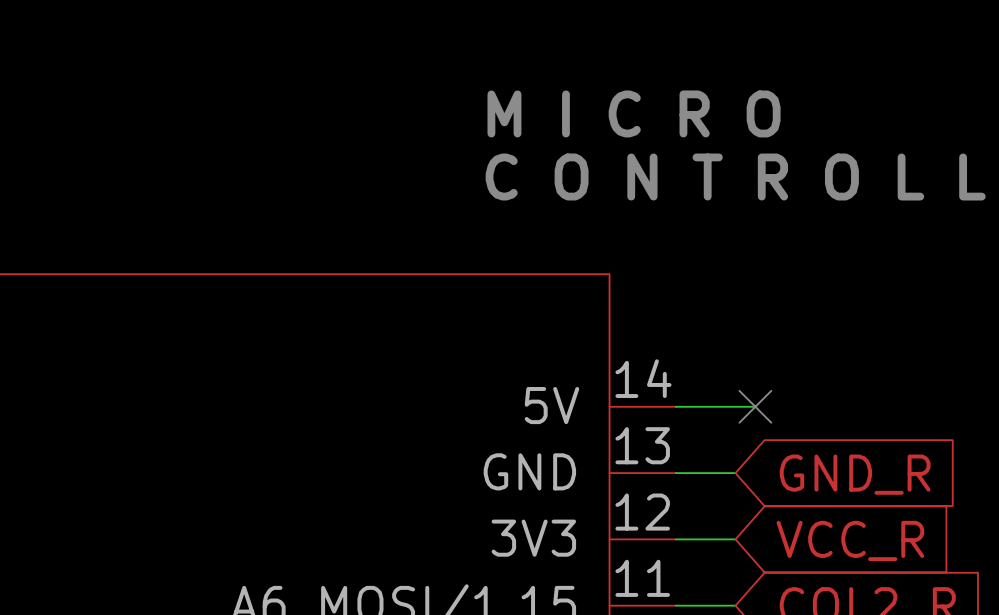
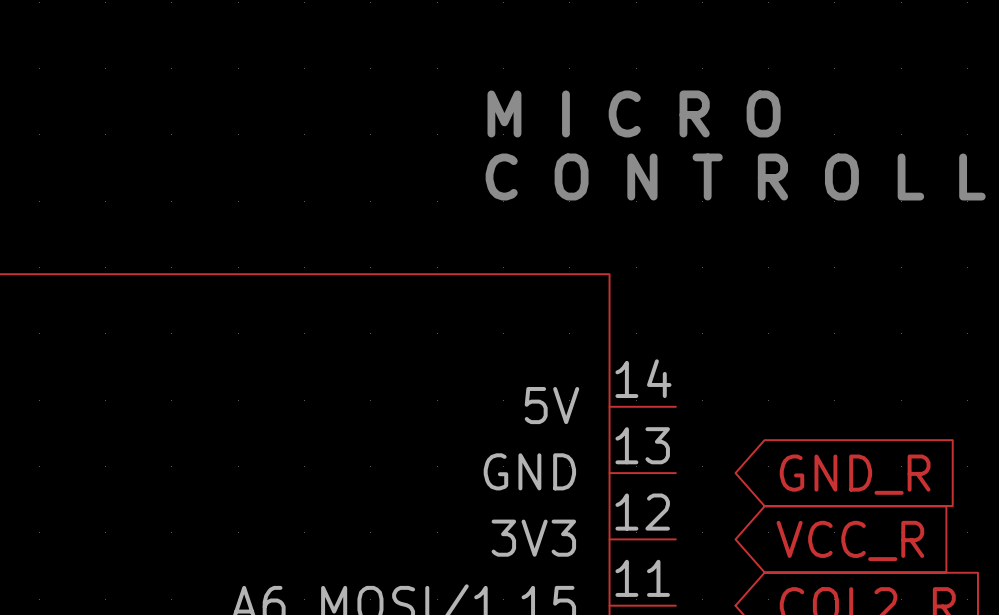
wire: (675, 406) (755, 406) -> none
no-connect mark: (755, 406) -> none
wire: (675, 473) (735, 473) -> none
wire: (675, 539) (735, 539) -> none
wire: (675, 605) (735, 605) -> none

